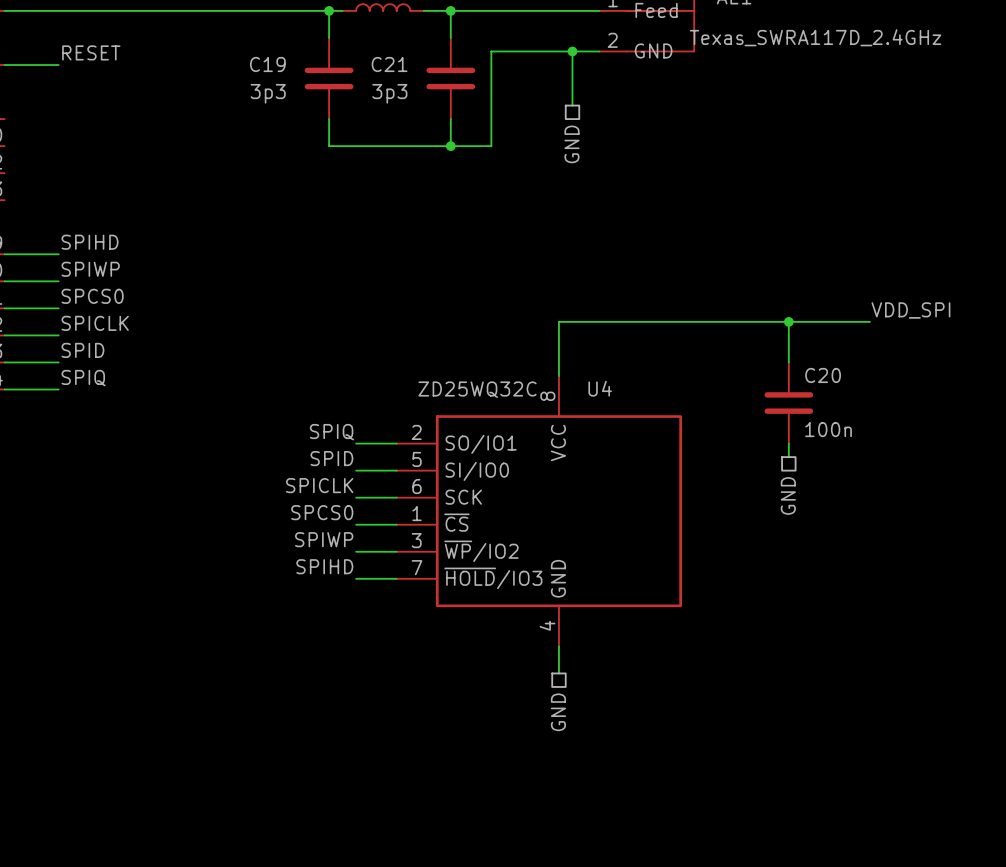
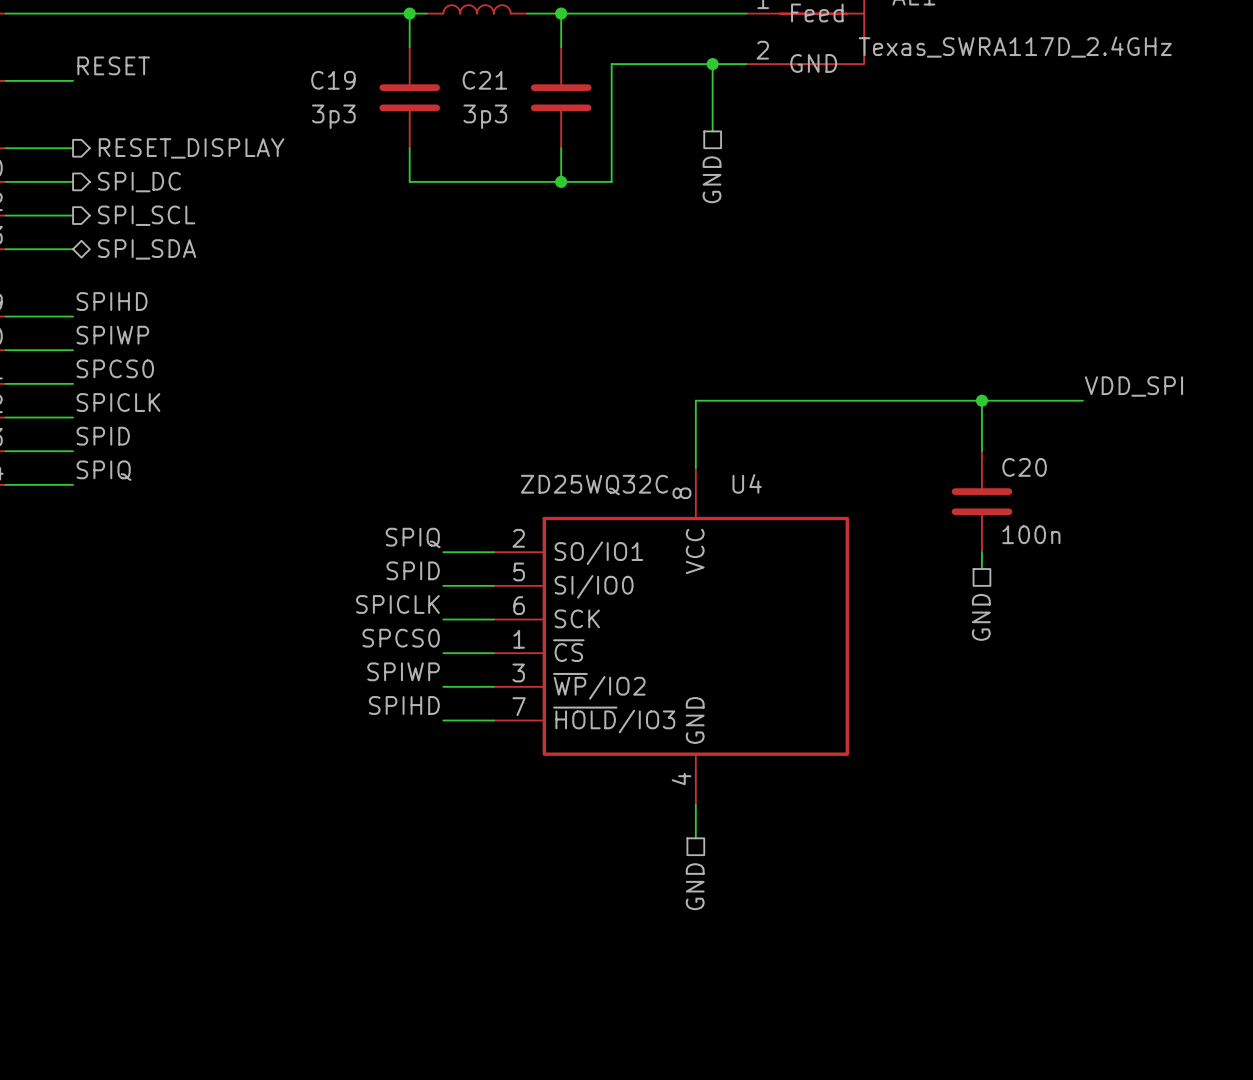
wire: none -> (5, 148) (73, 148)
hierarchical label: none -> RESET_DISPLAY (191, 148)
wire: none -> (5, 181) (73, 181)
hierarchical label: none -> SPI_DC (139, 182)
wire: none -> (5, 215) (73, 215)
hierarchical label: none -> SPI_SCL (146, 215)
wire: none -> (5, 249) (73, 249)
hierarchical label: none -> SPI_SDA (147, 249)

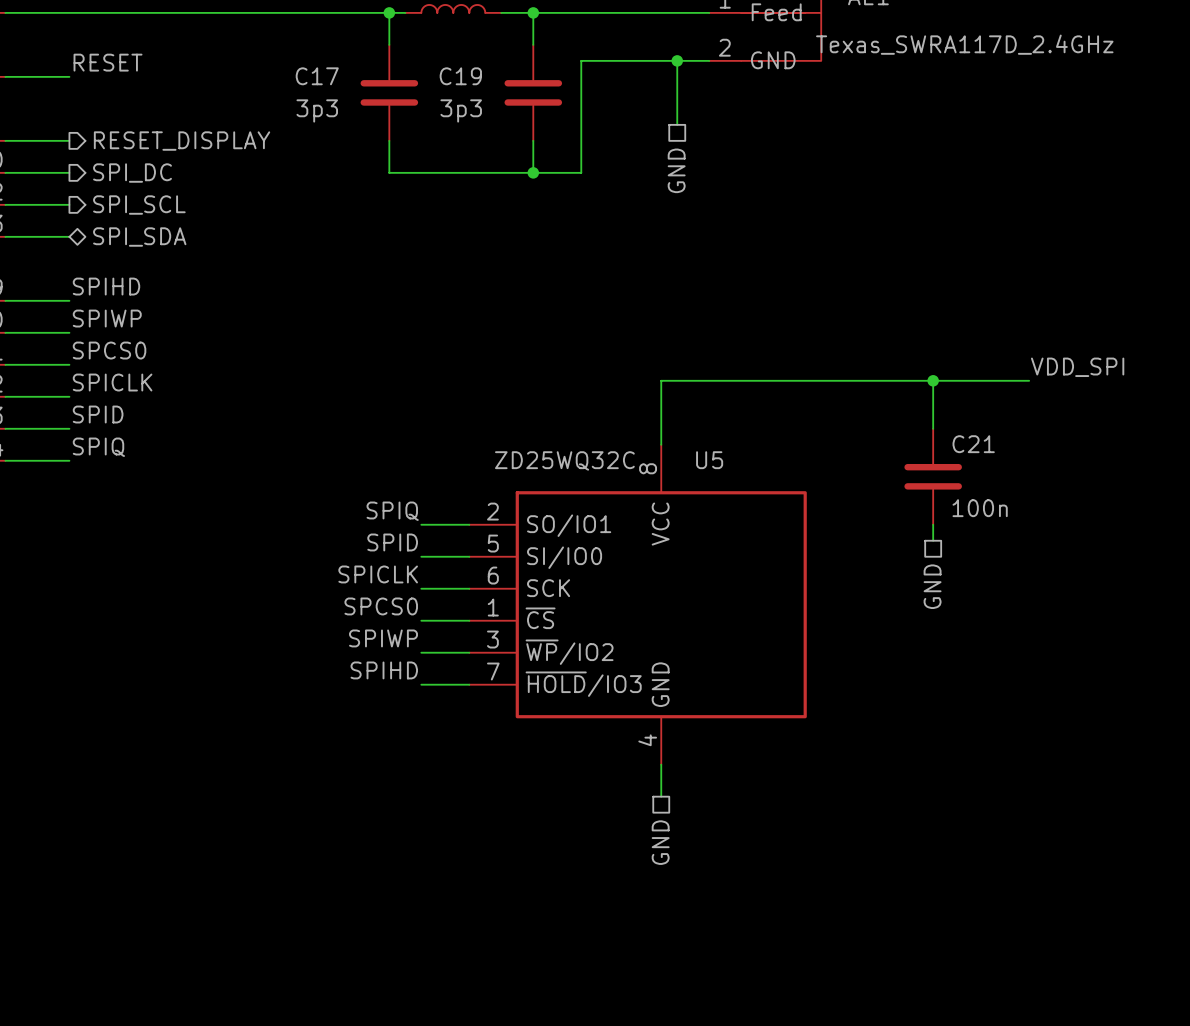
C19 name: C19 (333, 80) -> C17 (317, 76)
C21 name: C21 (484, 80) -> C19 (460, 76)
C20 name: C20 (1024, 467) -> C21 (973, 444)
U4 name: U4 (747, 483) -> U5 (709, 460)

